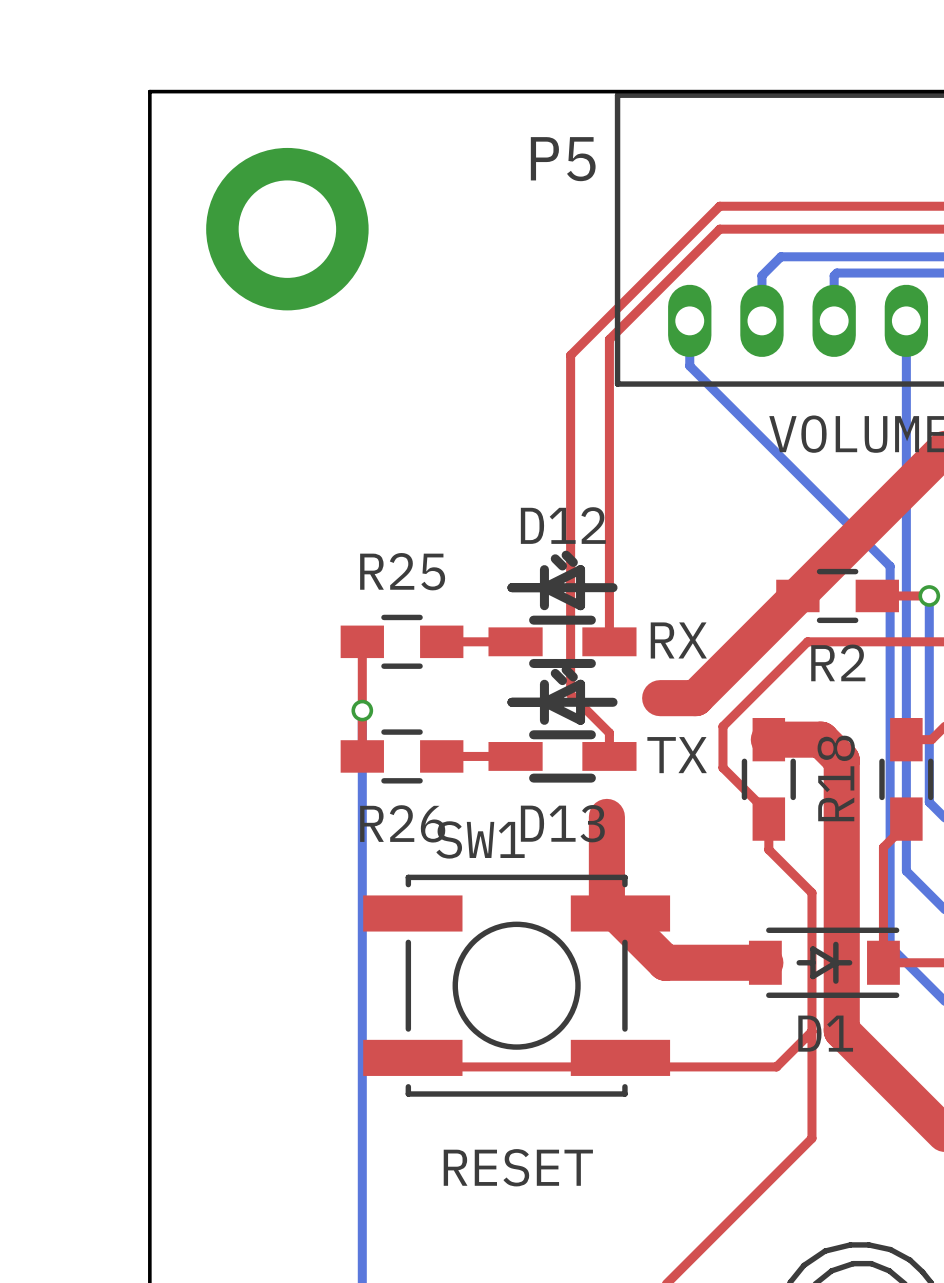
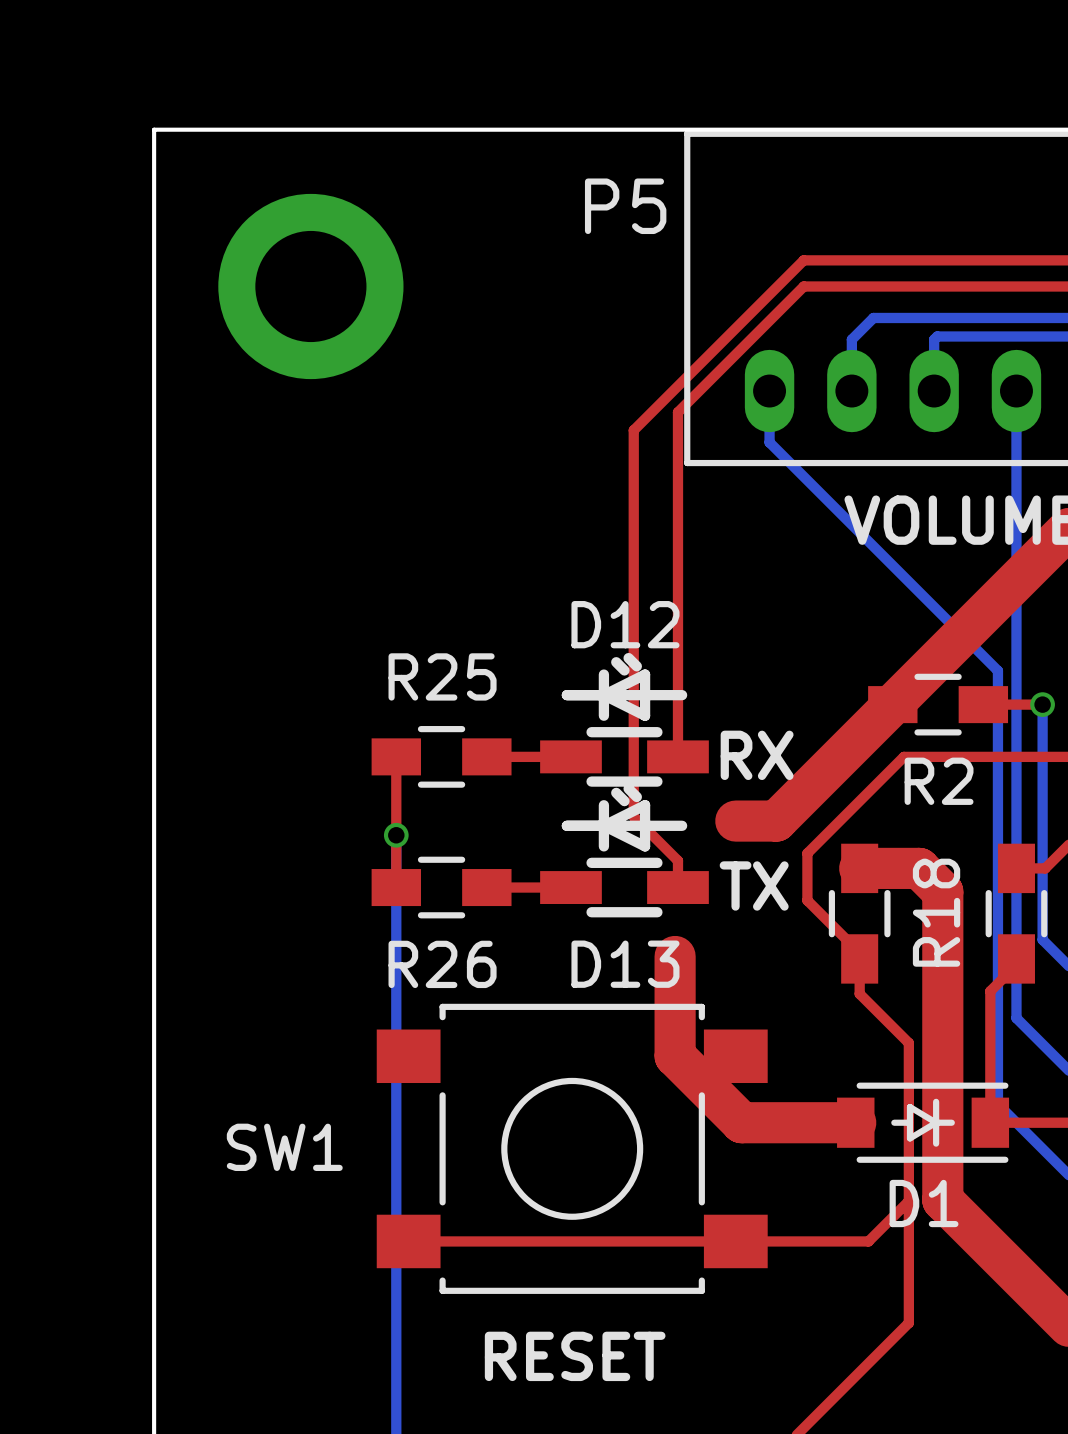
SW1 name position: SW1 (480, 839) -> SW1 (284, 1147)
SW1 footprint: [363, 874, 671, 1097] -> [376, 1003, 768, 1294]

